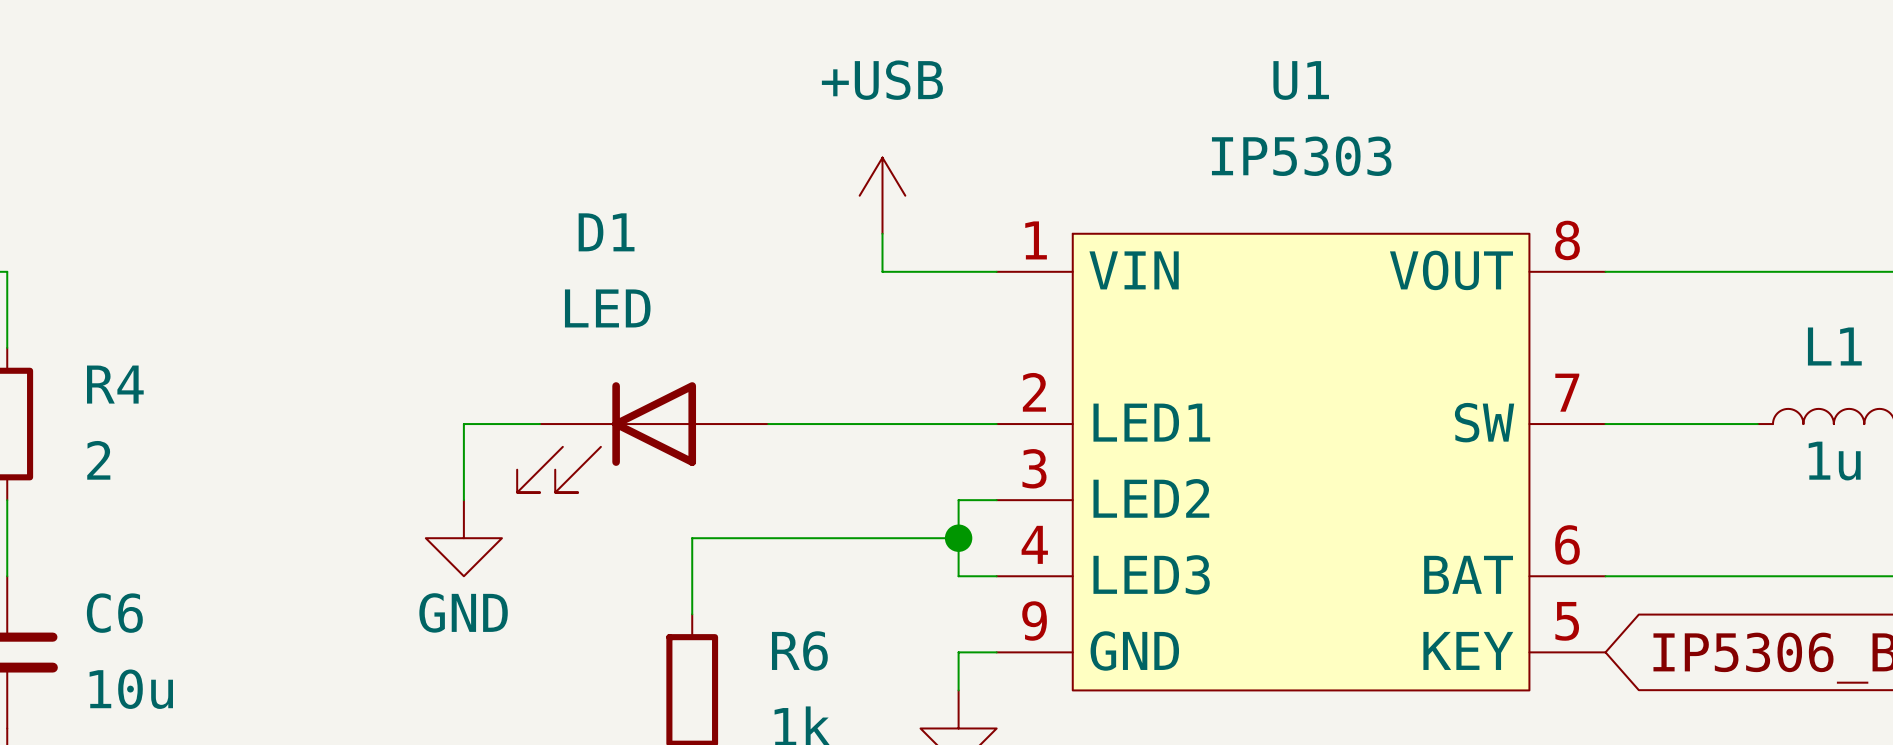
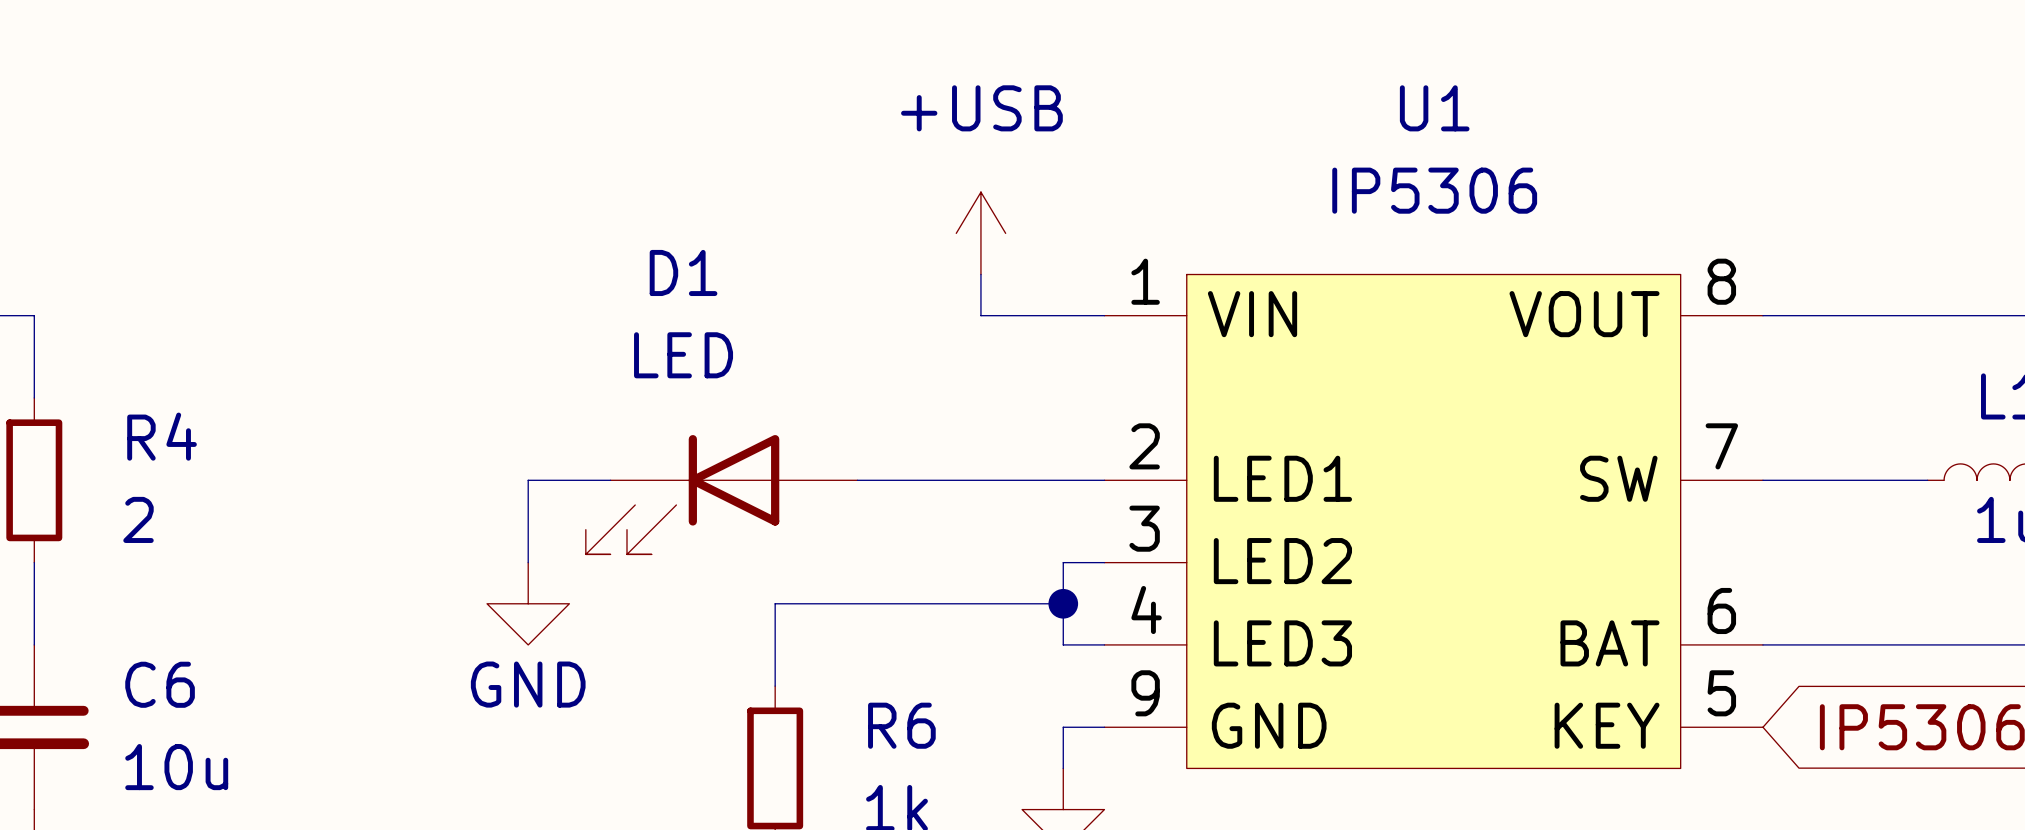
U1 value: IP5303 (1301, 156) -> IP5306 (1434, 190)

